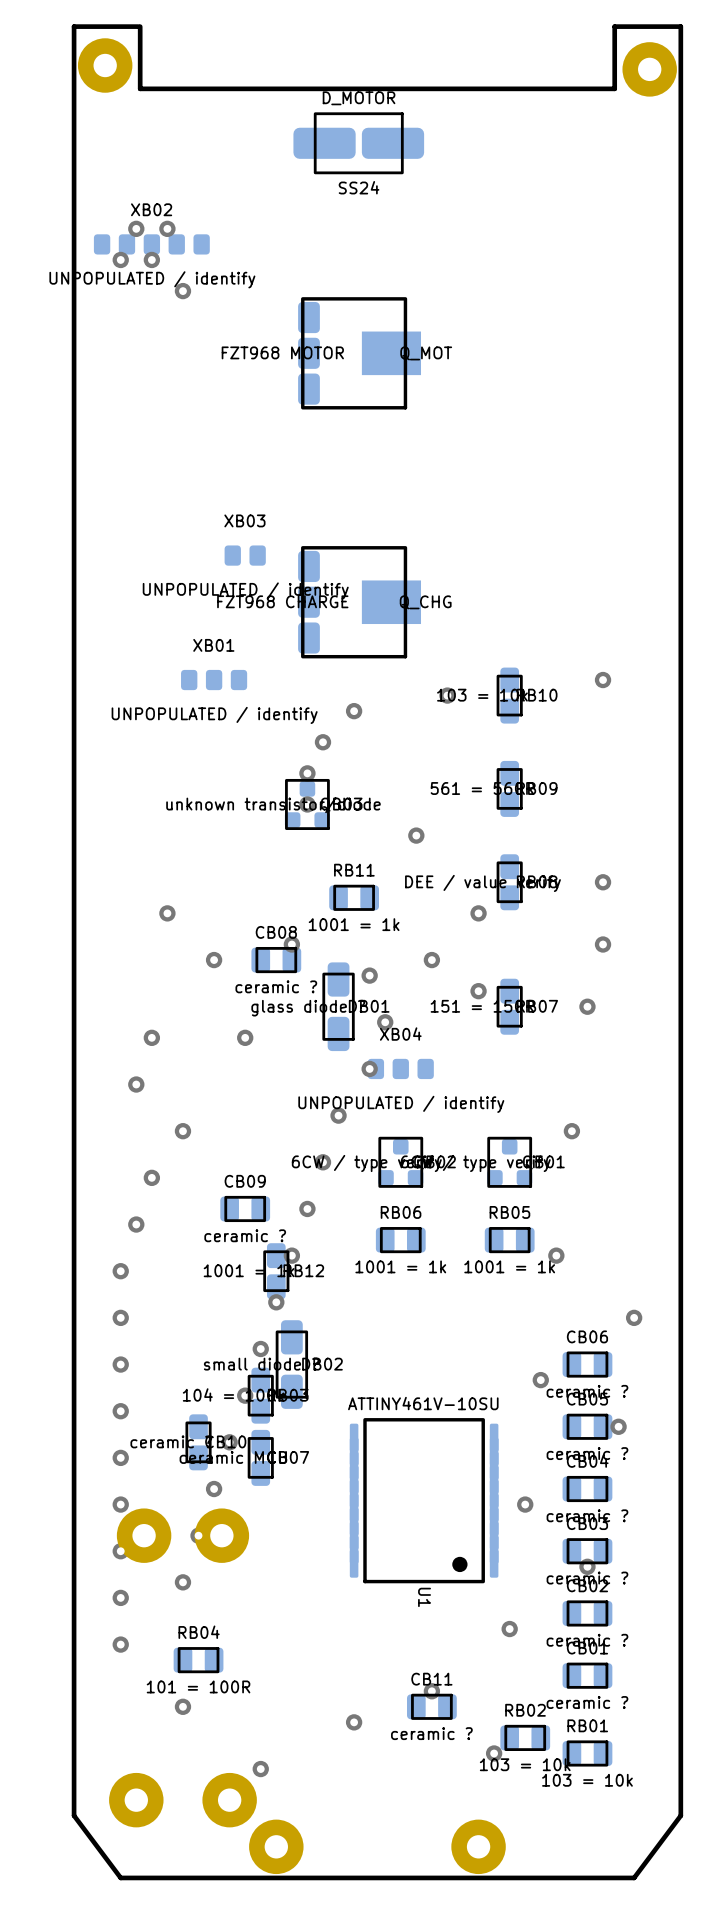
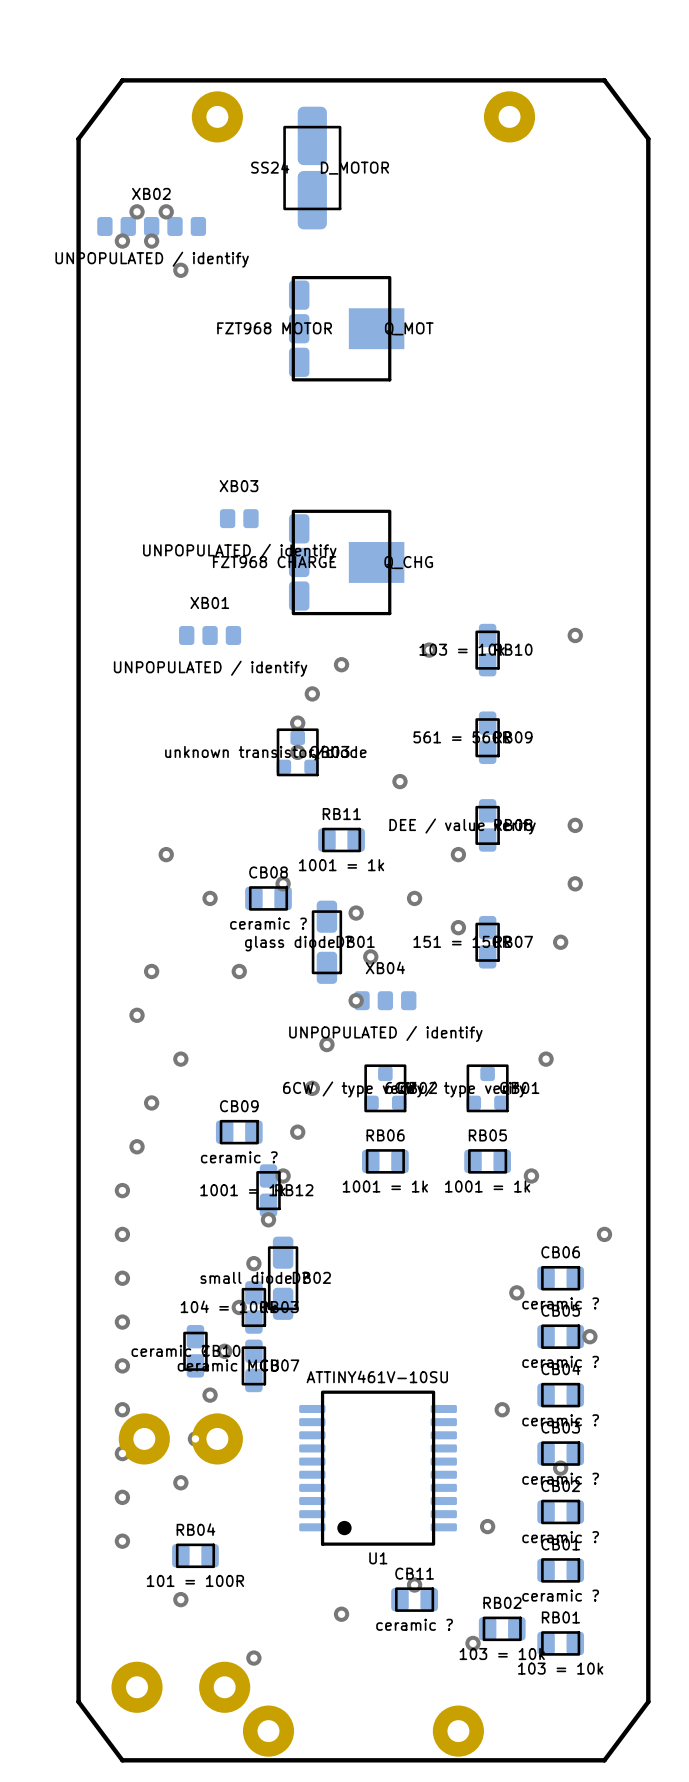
board edge: (138, 26) (74, 26) (74, 151) -> (140, 80) (122, 80) (78, 138)
board edge: (140, 26) (140, 88) -> none
part position: (105, 65) -> (217, 116)
part position: (649, 69) -> (509, 116)
board edge: (614, 88) (614, 26) (680, 26) (680, 151) -> (586, 80) (604, 80) (648, 138)
D_MOTOR rotation: 0° (358, 143) -> 90° clockwise (312, 168)
U1 footprint: [349, 1418, 499, 1584] -> [299, 1390, 457, 1546]

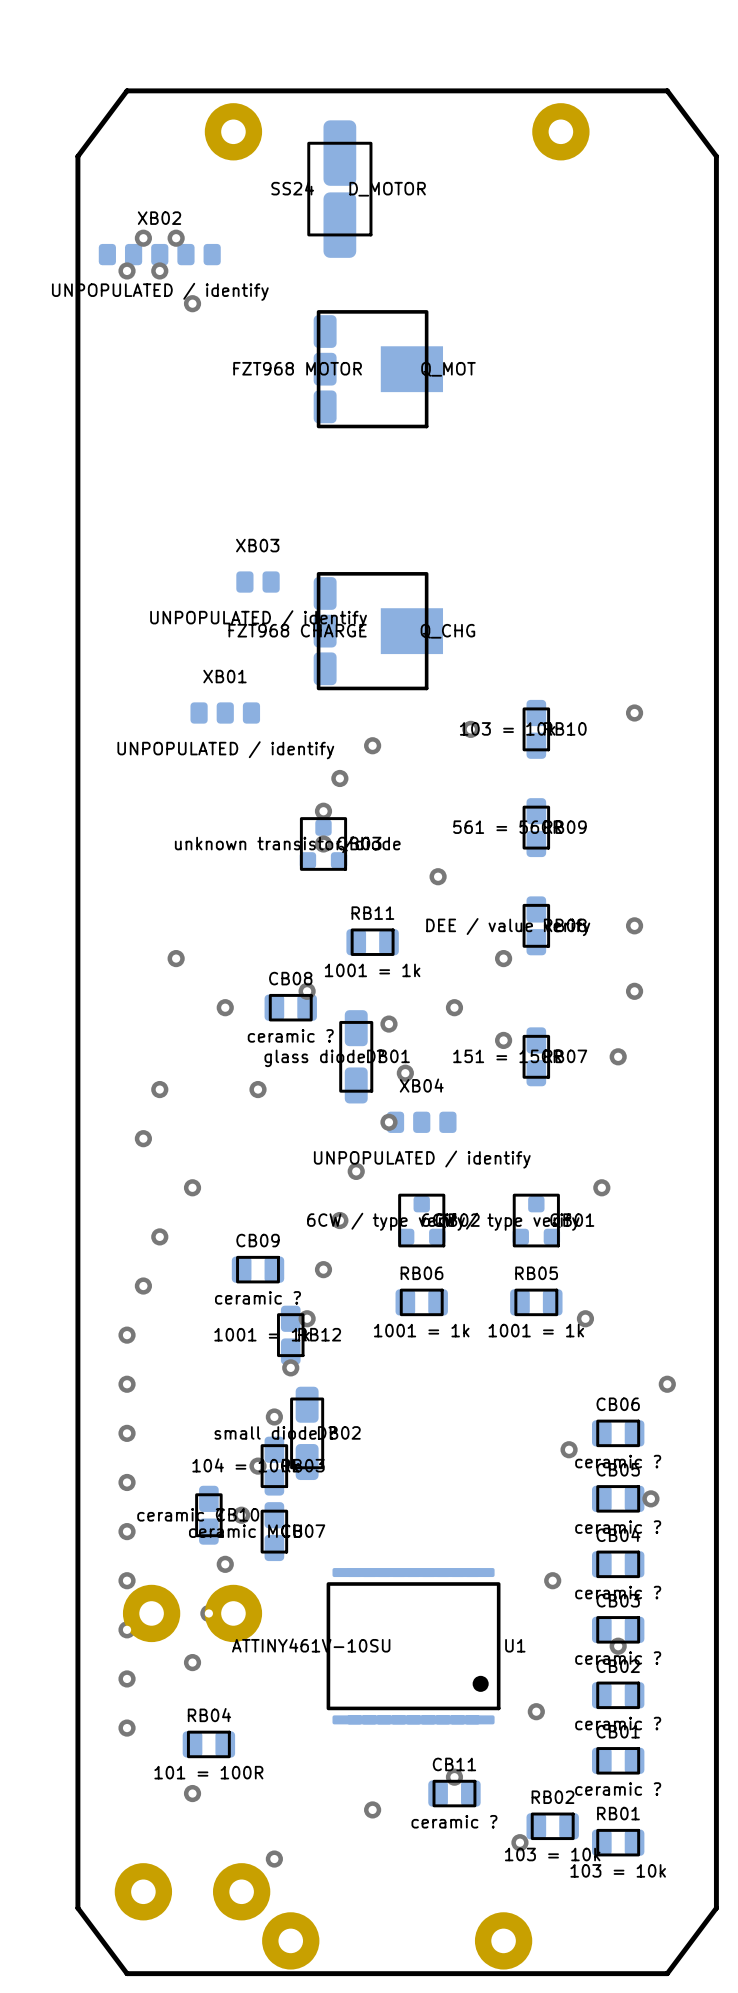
U1 value position: ATTINY461V-10SU (377, 1376) -> ATTINY461V-10SU (311, 1645)
U1 footprint: [299, 1390, 457, 1546] -> [326, 1568, 501, 1725]
U1 name position: U1 (378, 1558) -> U1 (515, 1645)

